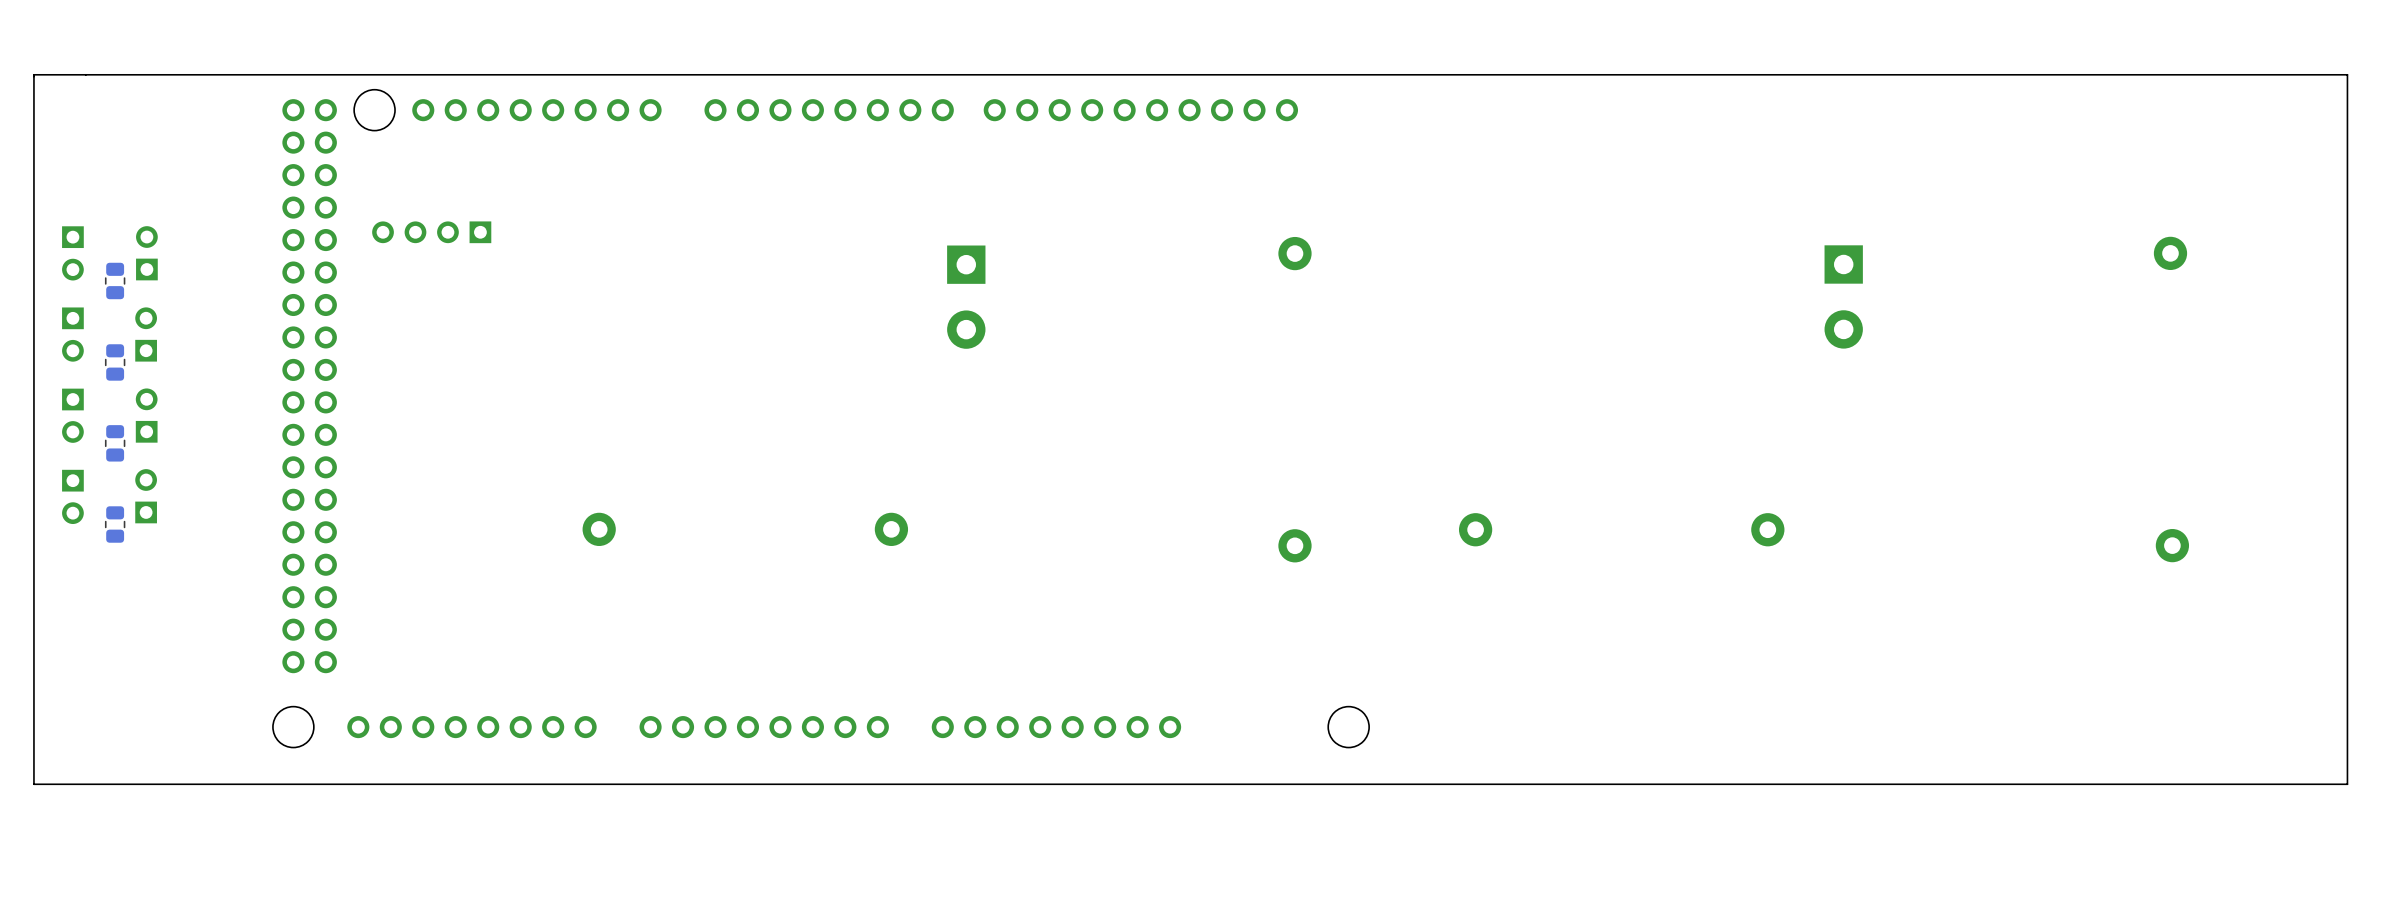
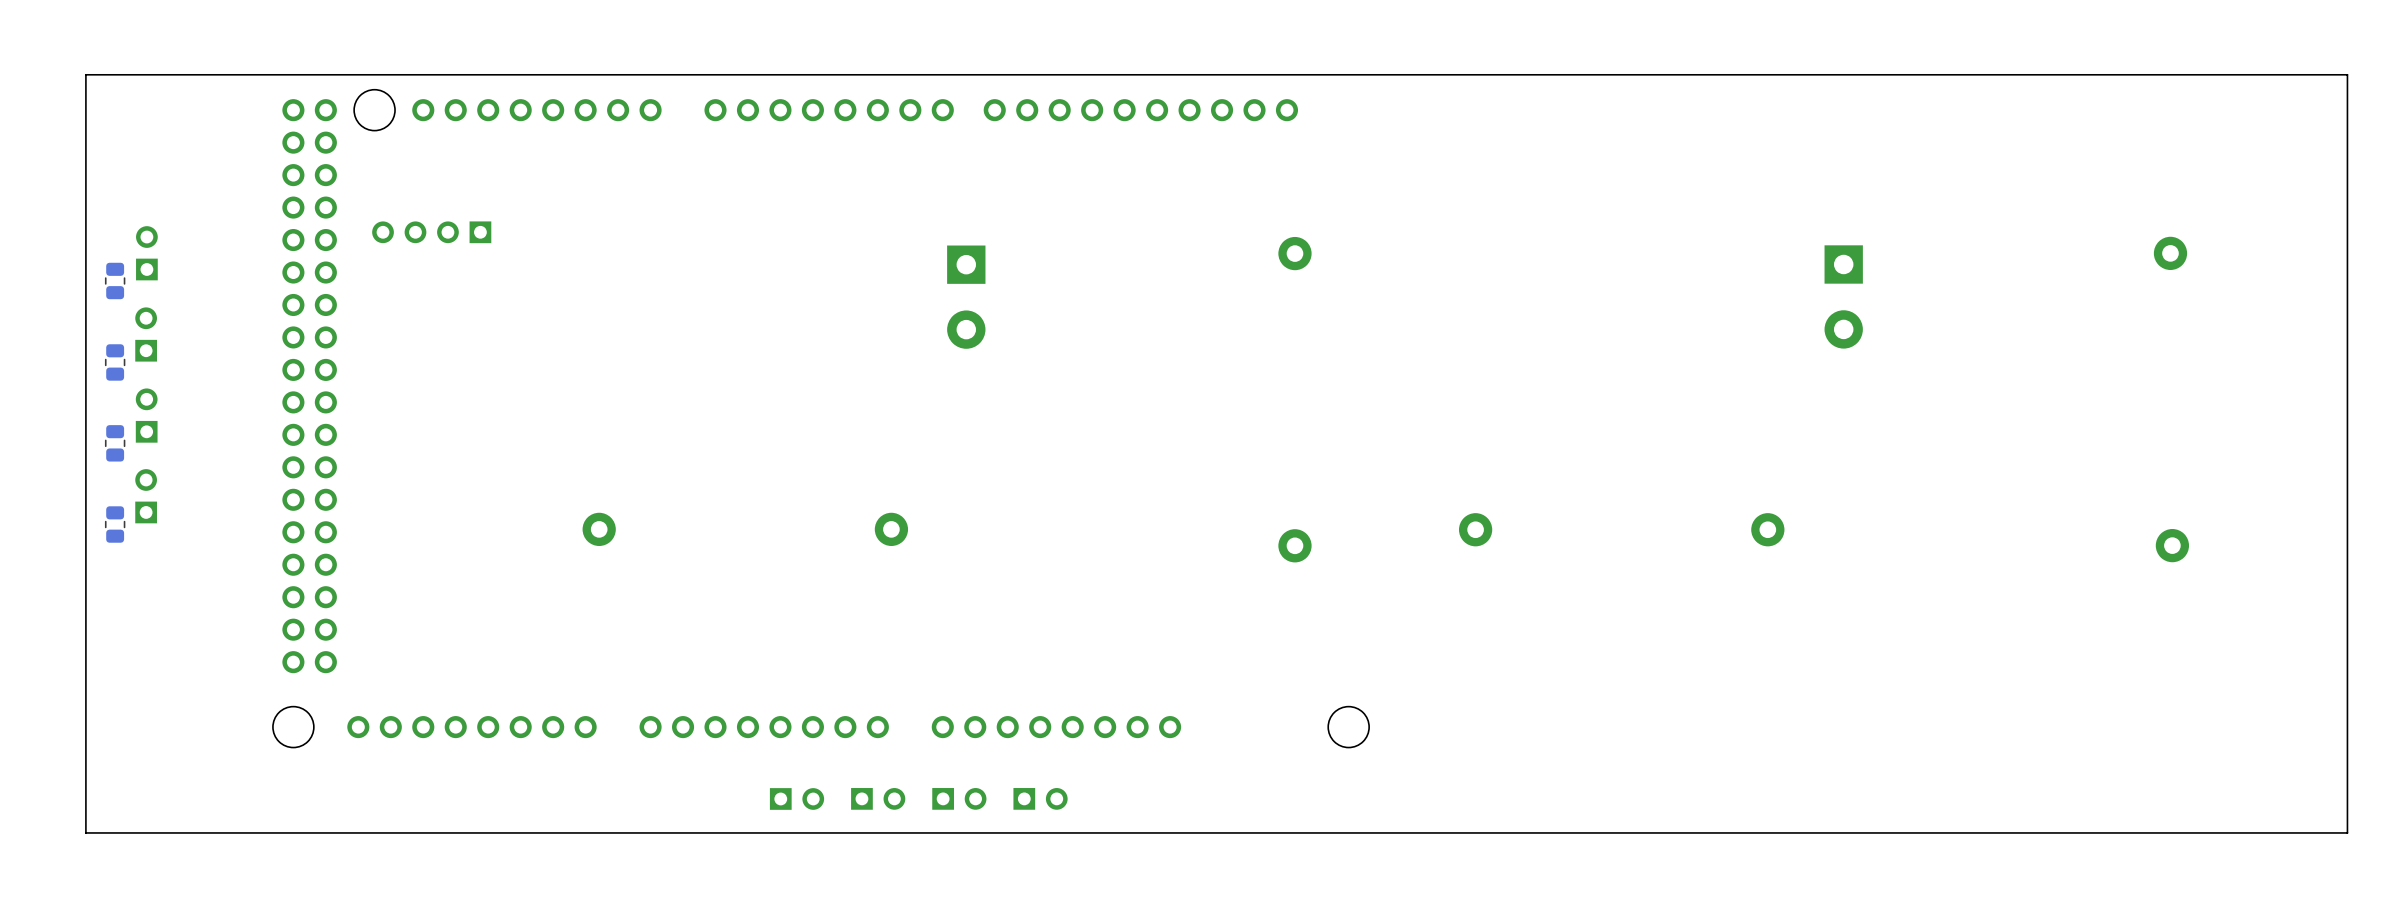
board edge: (85, 74) (33, 74) (33, 784) (2347, 784) -> (85, 74) (85, 832) (2347, 832) (2347, 784)
part: (72, 253) -> none
part: (72, 334) -> none
part: (72, 415) -> none
part: (72, 496) -> none
part: none -> (797, 798)
part: none -> (878, 798)
part: none -> (959, 798)
part: none -> (1040, 798)

